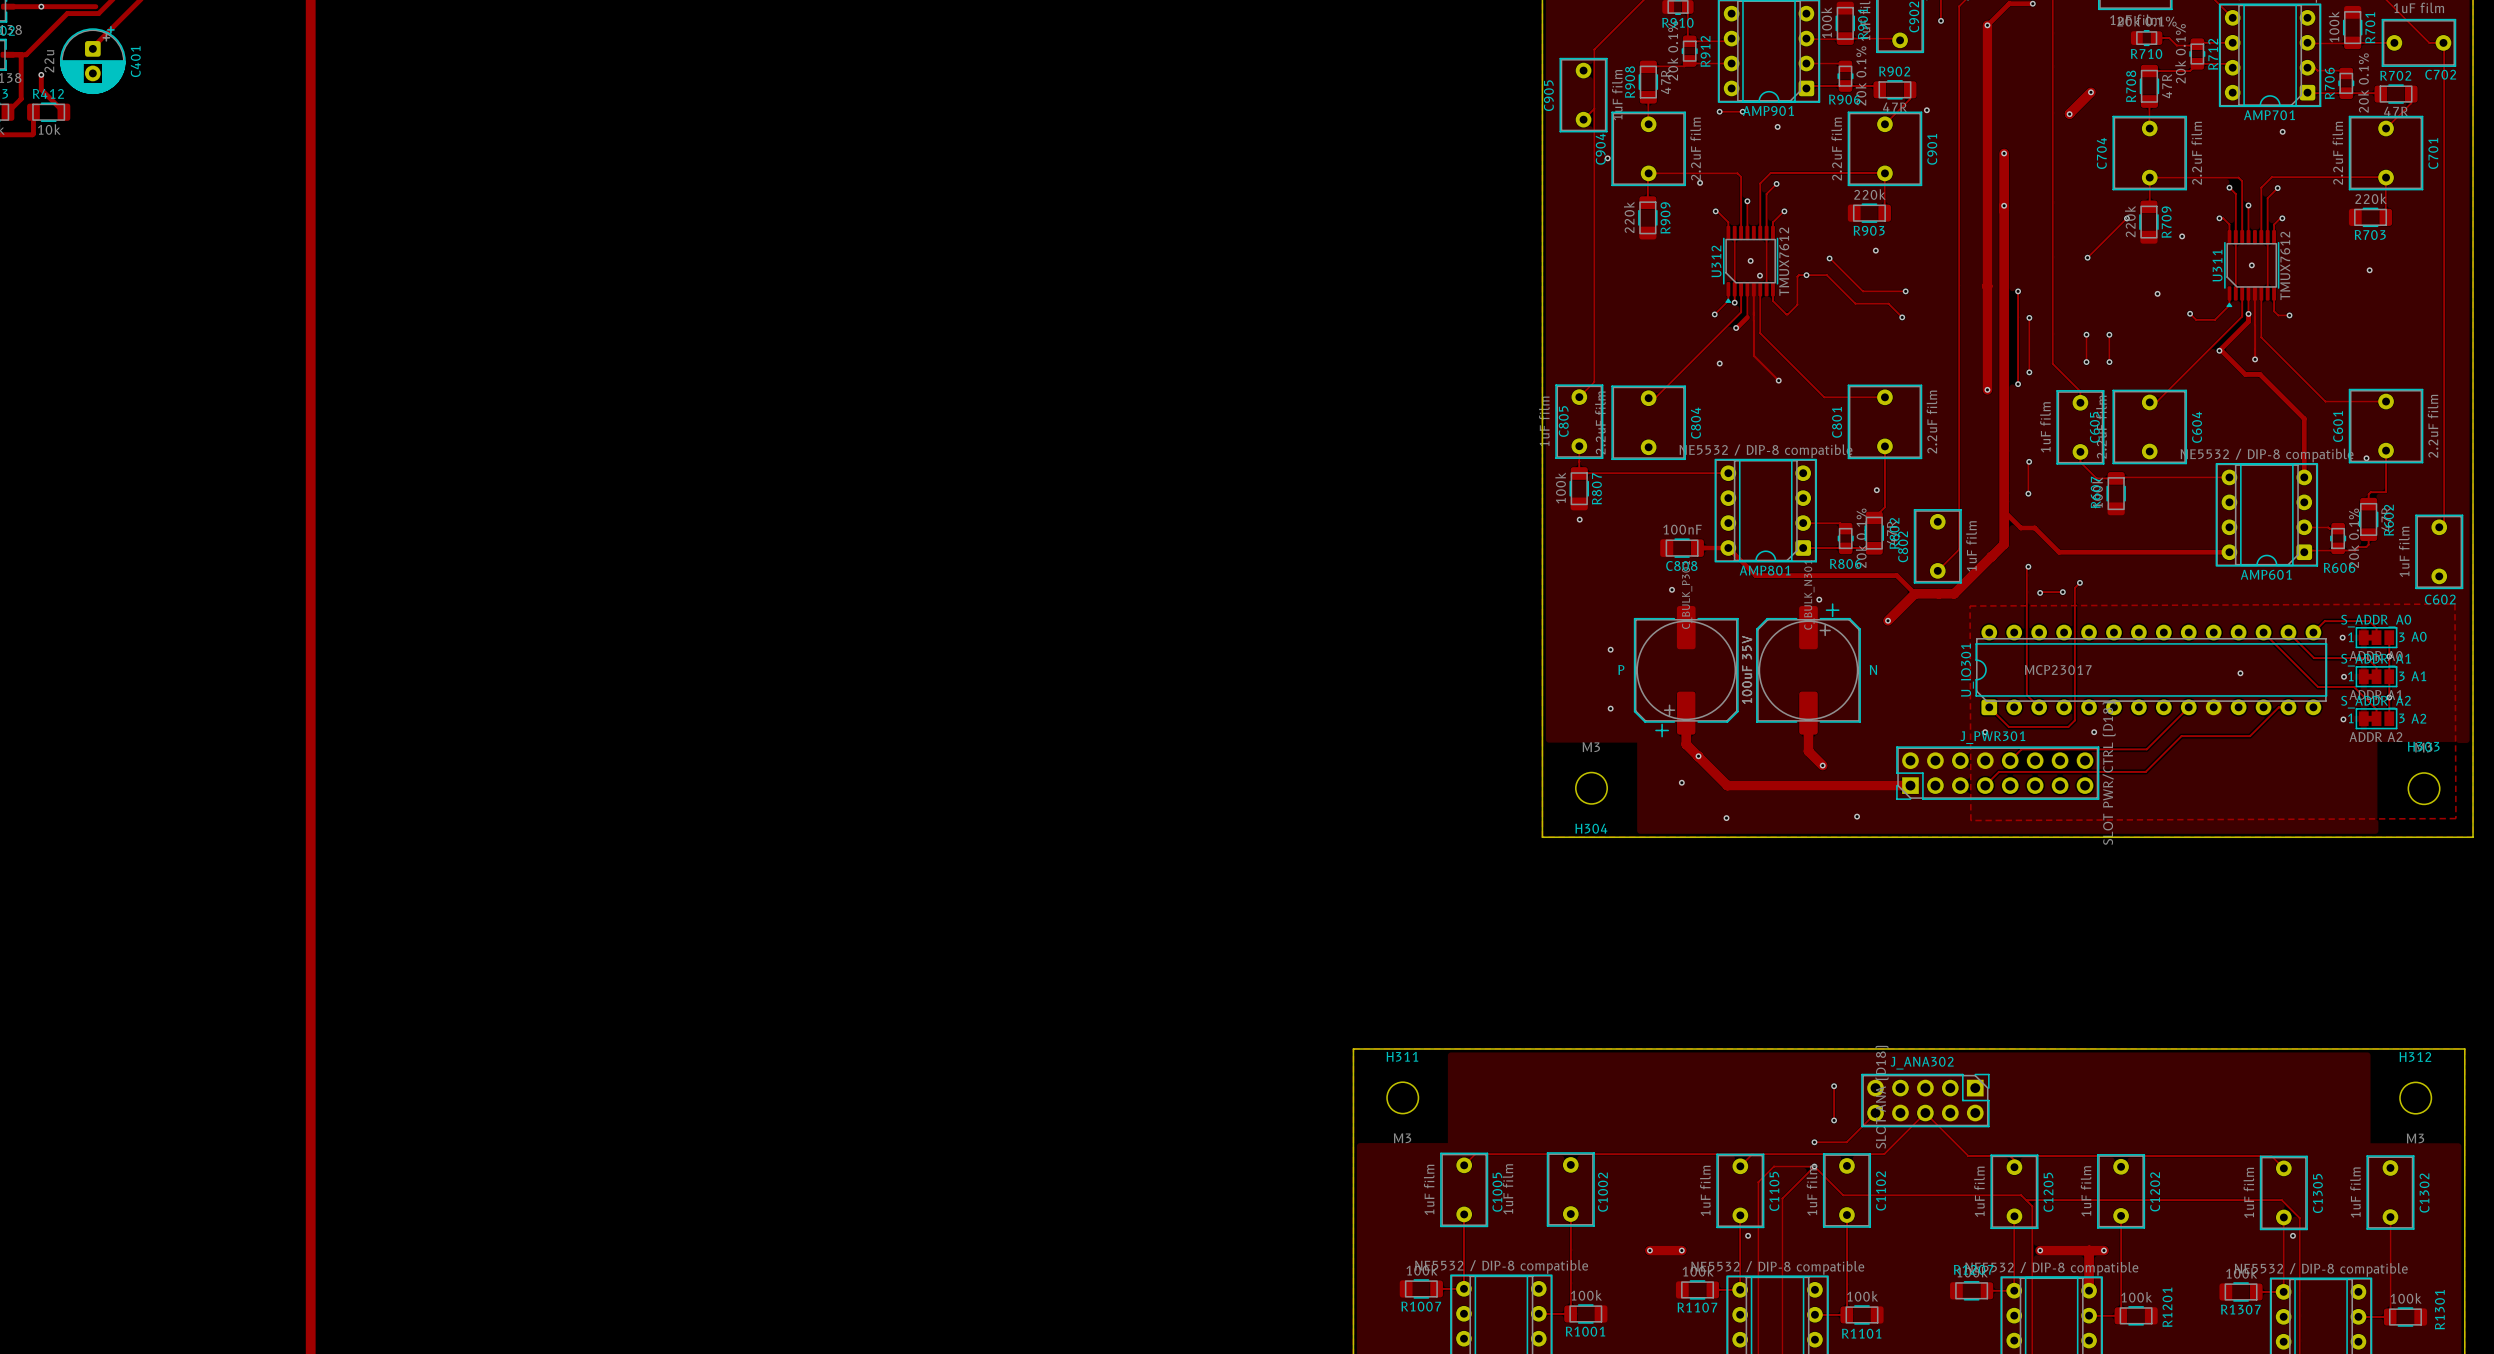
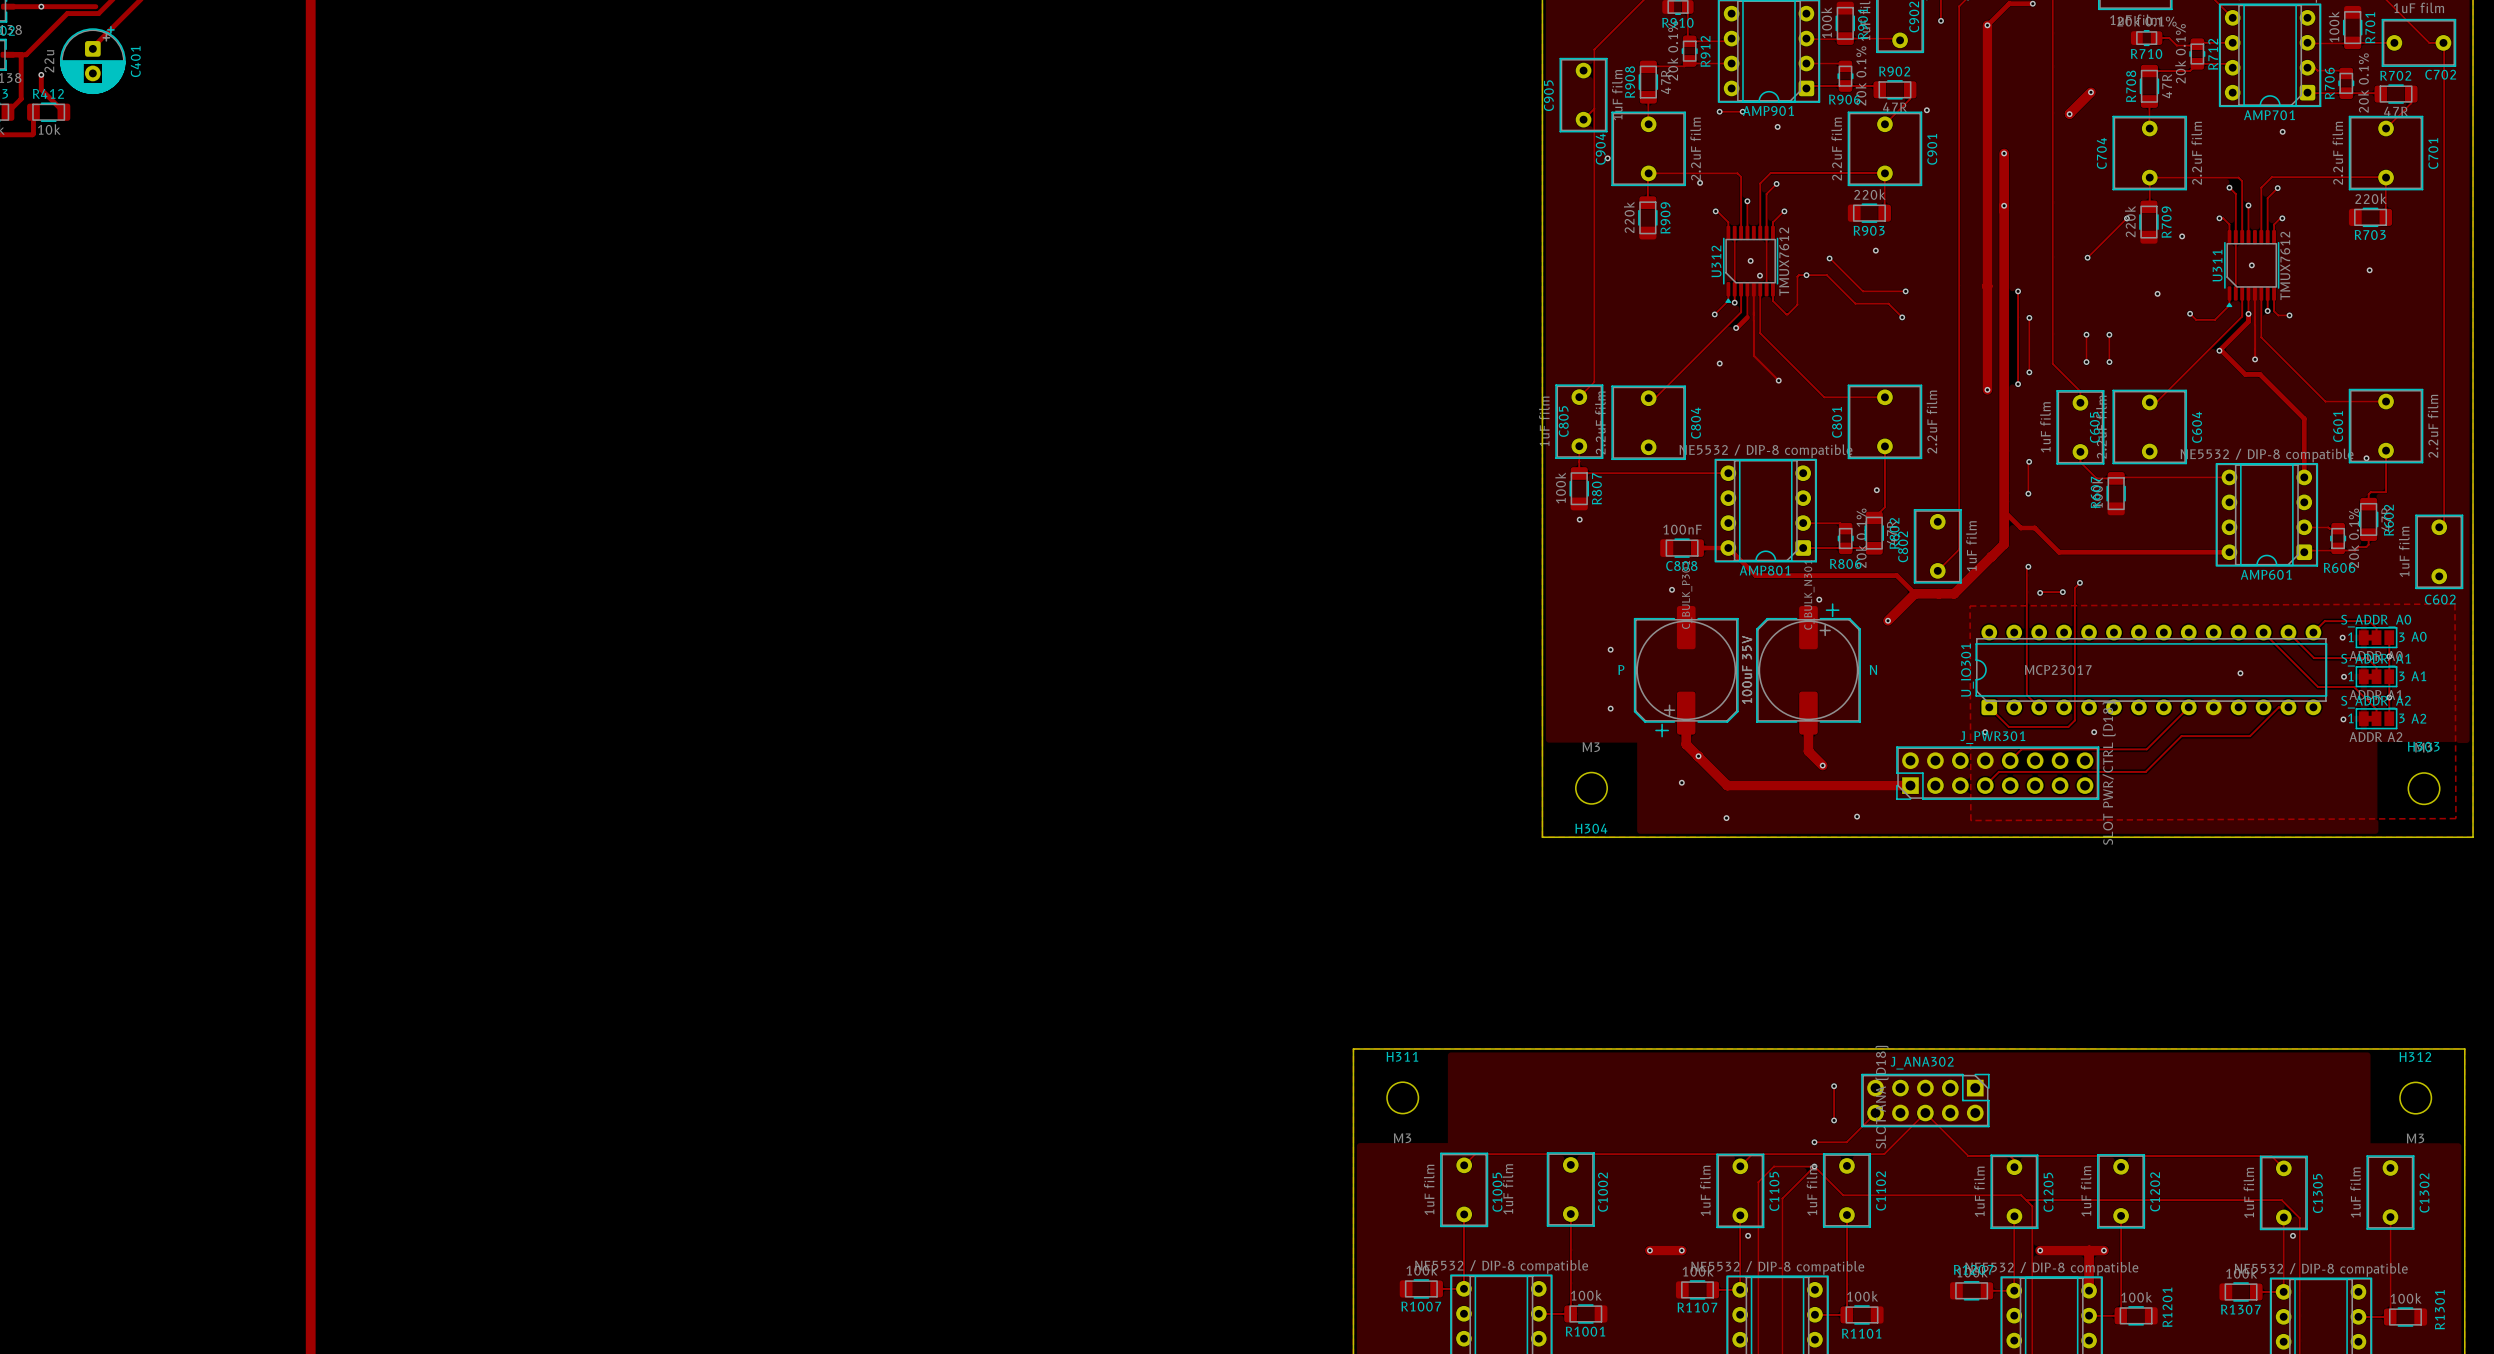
track: (2267, 237) (2267, 293) -> (2267, 311) (2267, 293)
via: none -> (2267, 311)

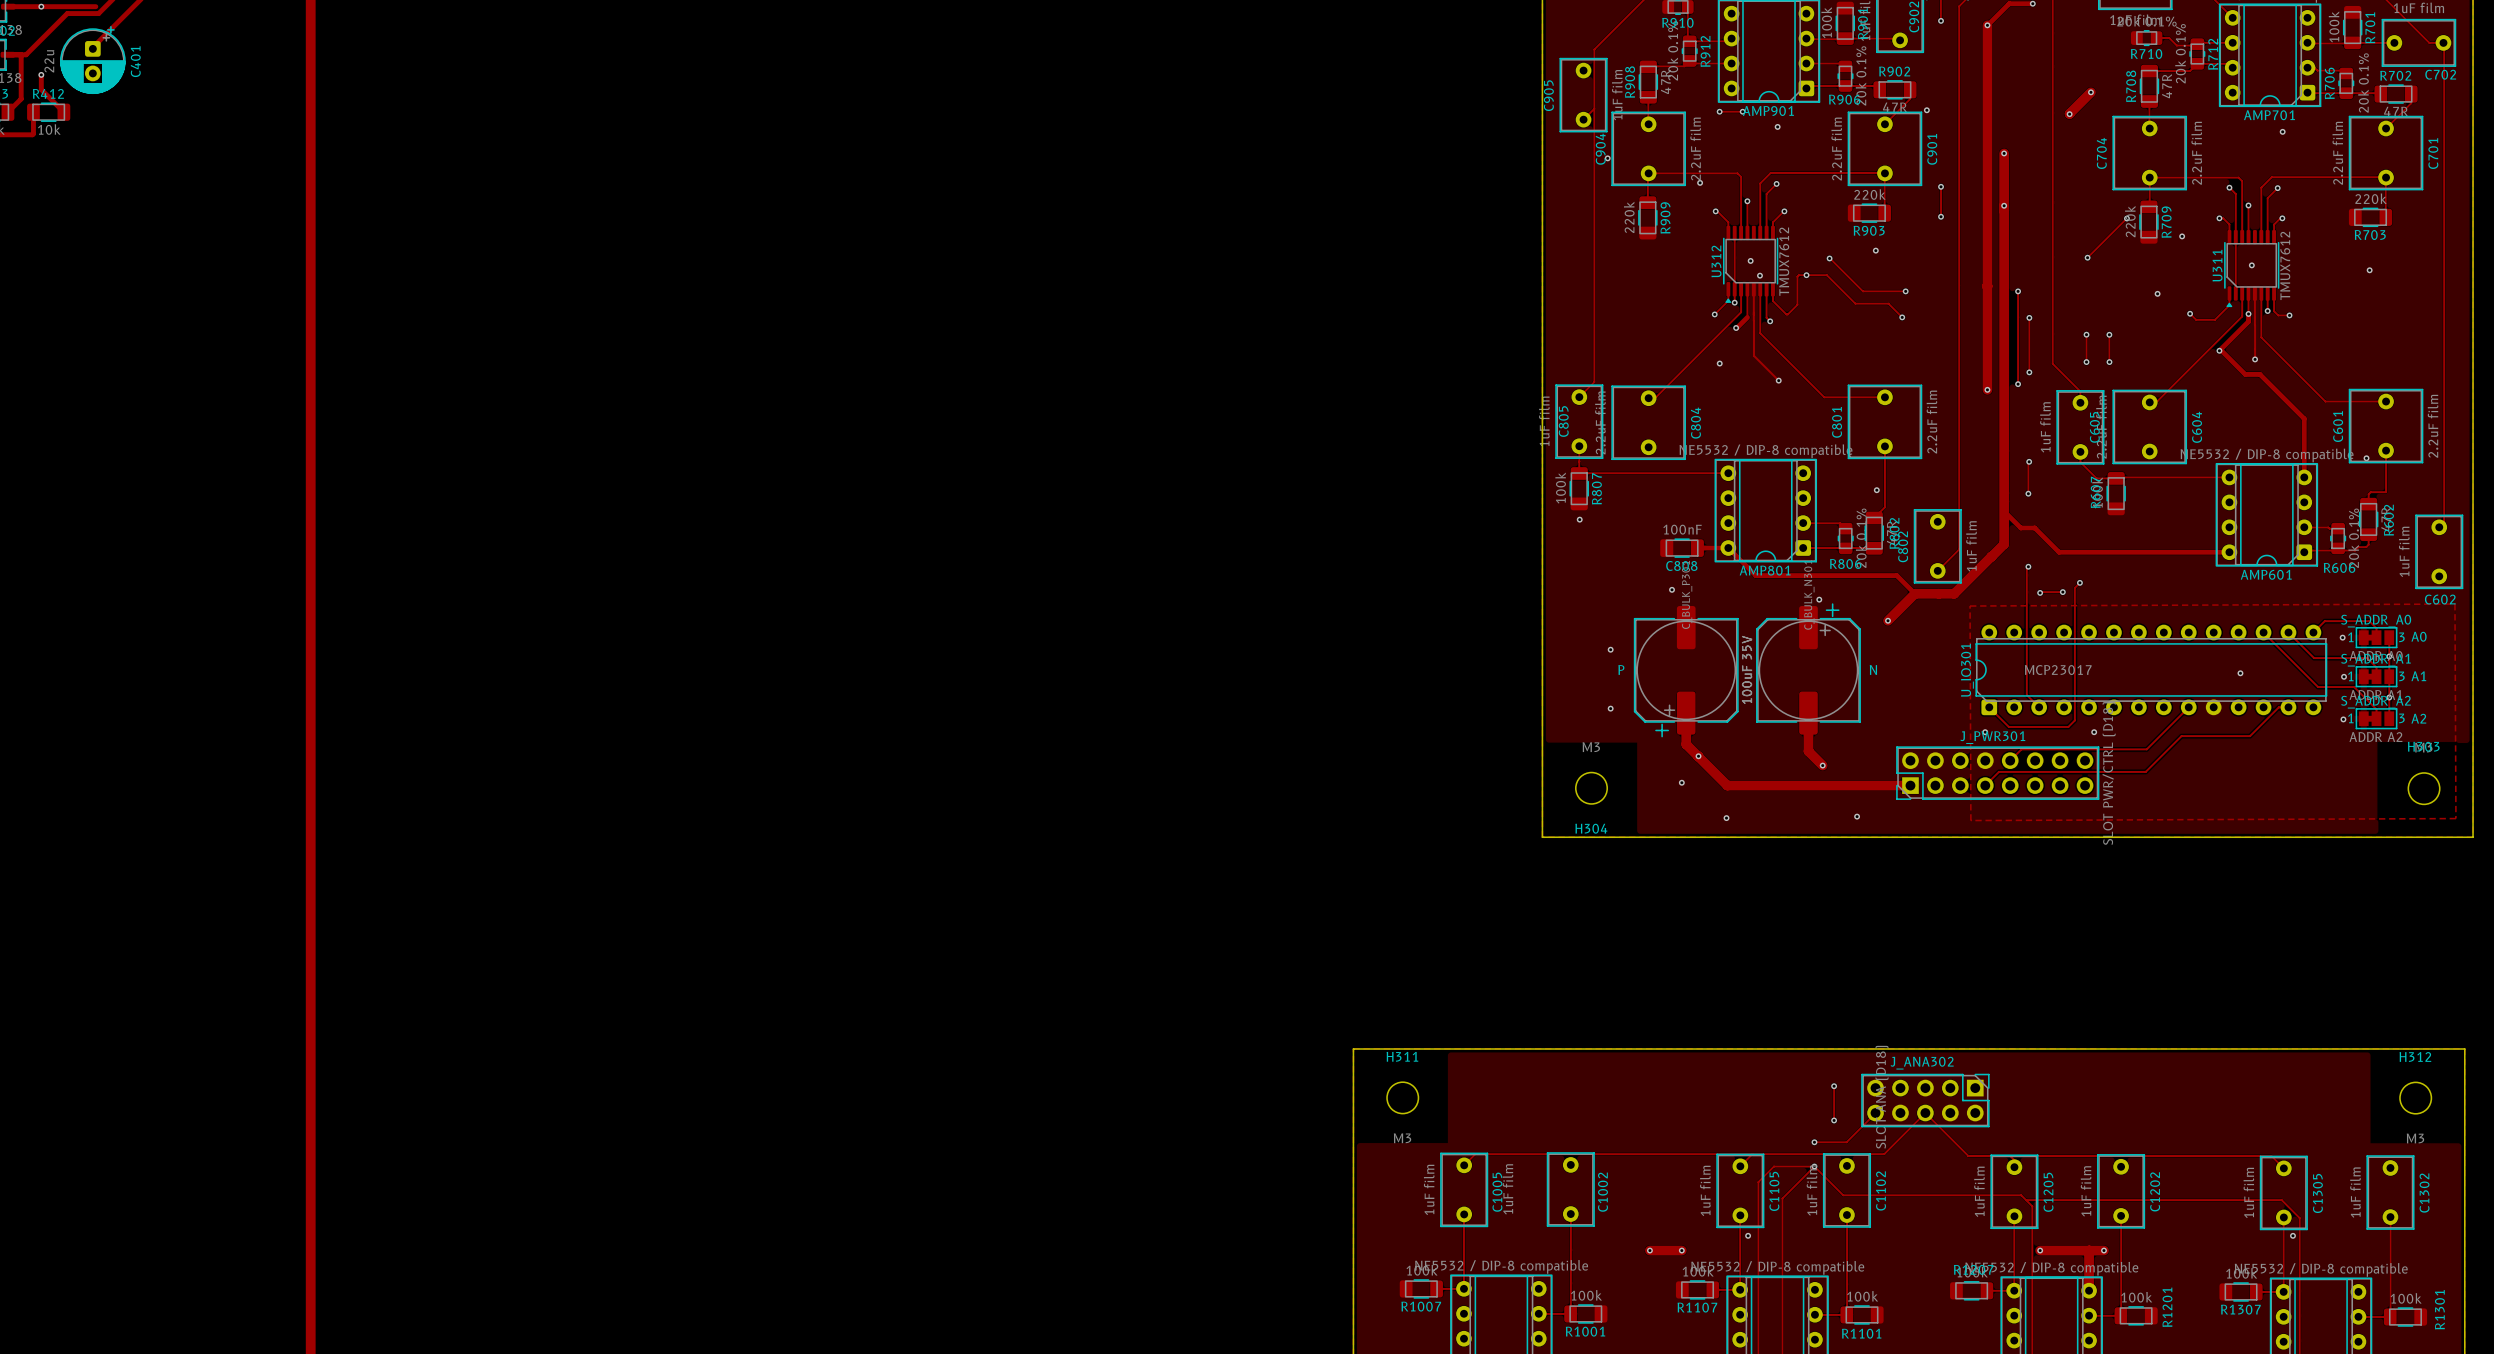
track: none -> (1941, 186) (1941, 216)
via: none -> (1941, 186)
via: none -> (1941, 216)
track: (1766, 233) (1766, 289) -> (1770, 321) (1766, 317) (1766, 289)
via: none -> (1770, 321)

